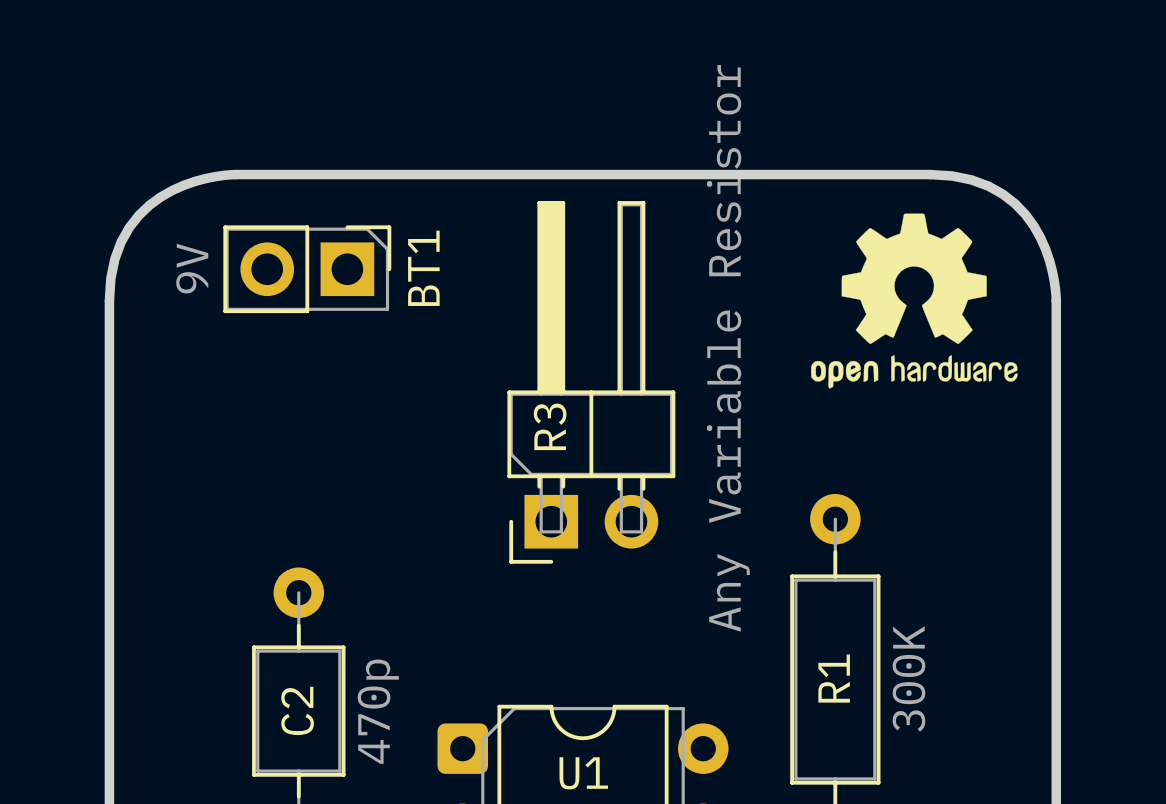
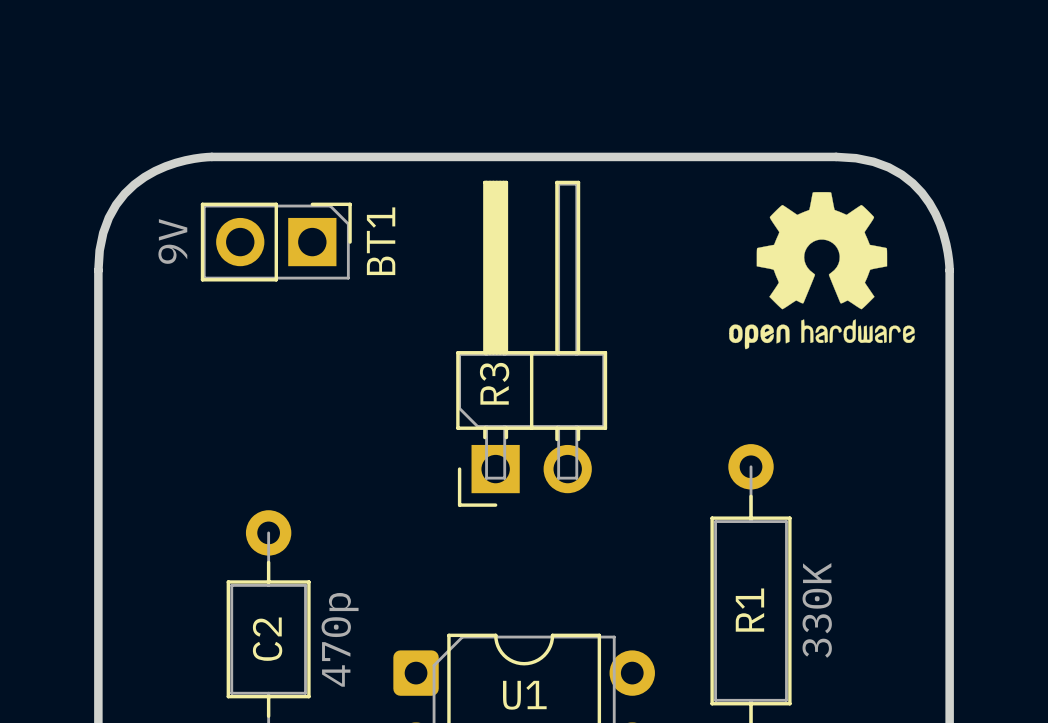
R3 value: Any Variable Resistor (728, 348) -> none
R1 value: 300K (908, 678) -> 330K (817, 610)

